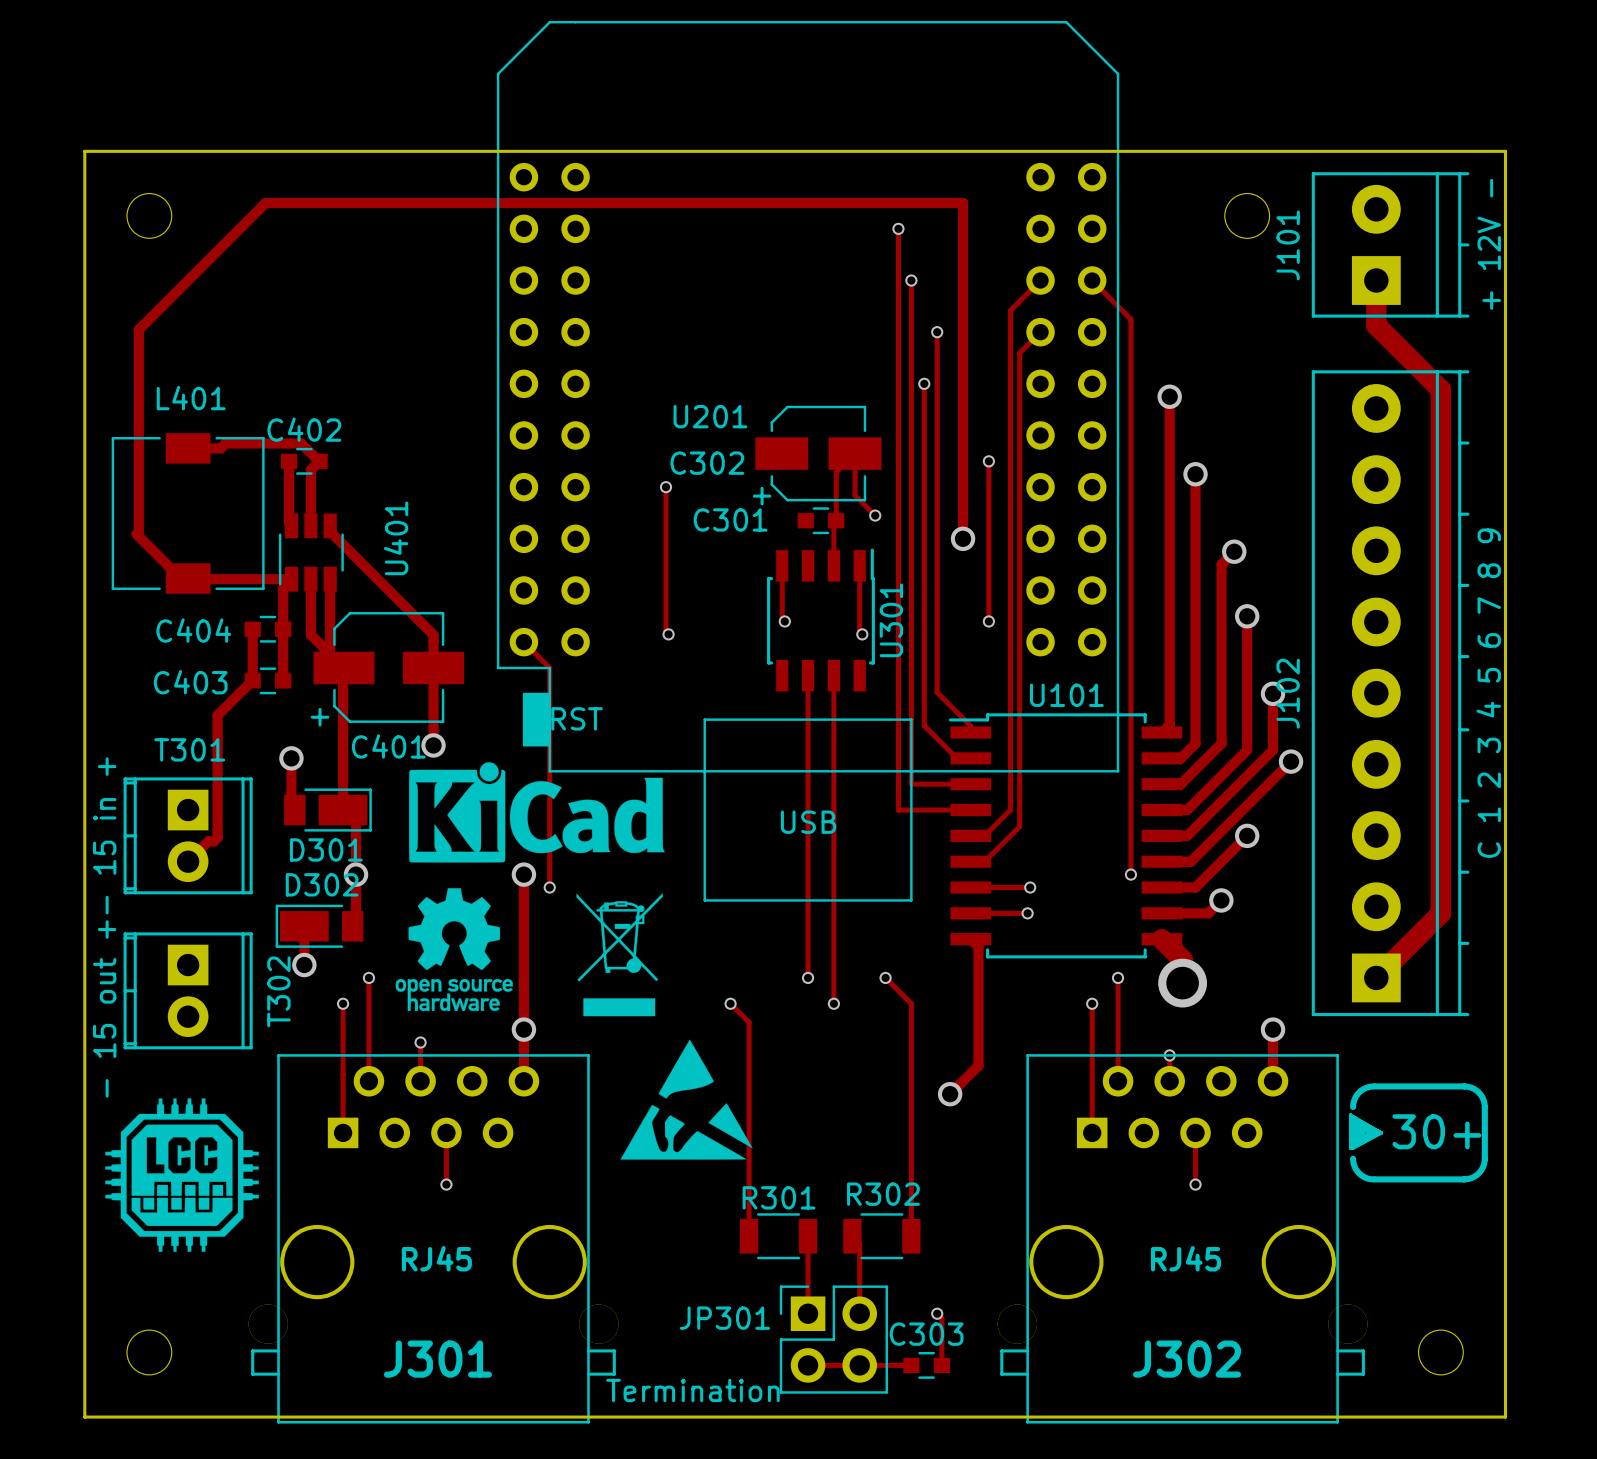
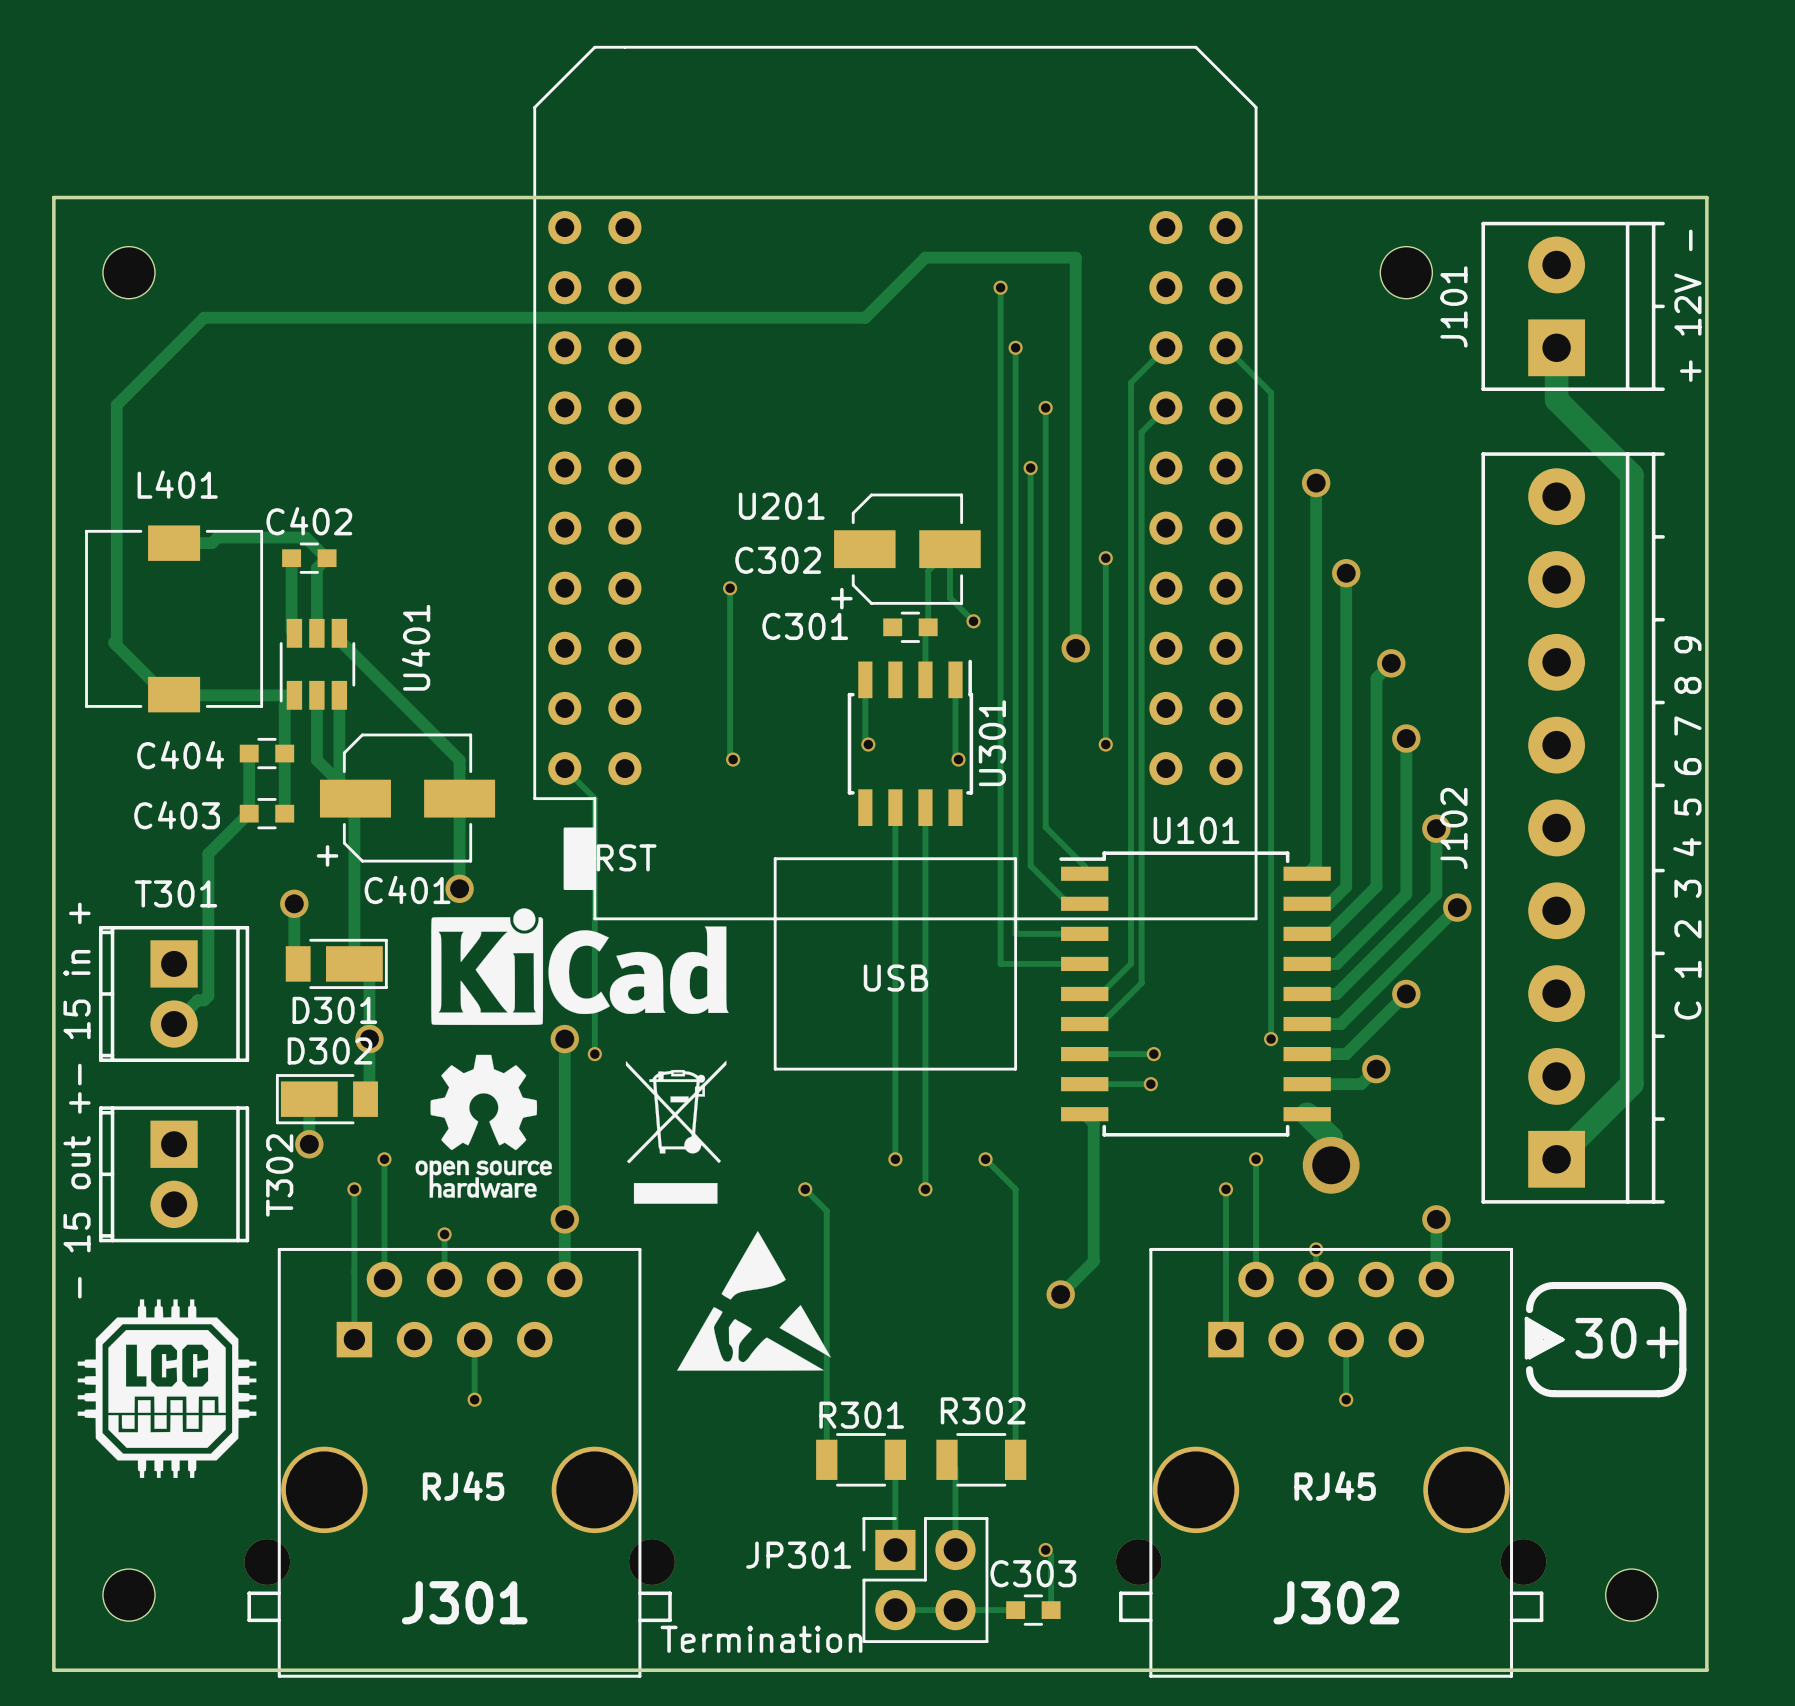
track: (833, 203) (265, 203) (213, 254) -> (925, 257) (865, 317) (204, 317)

